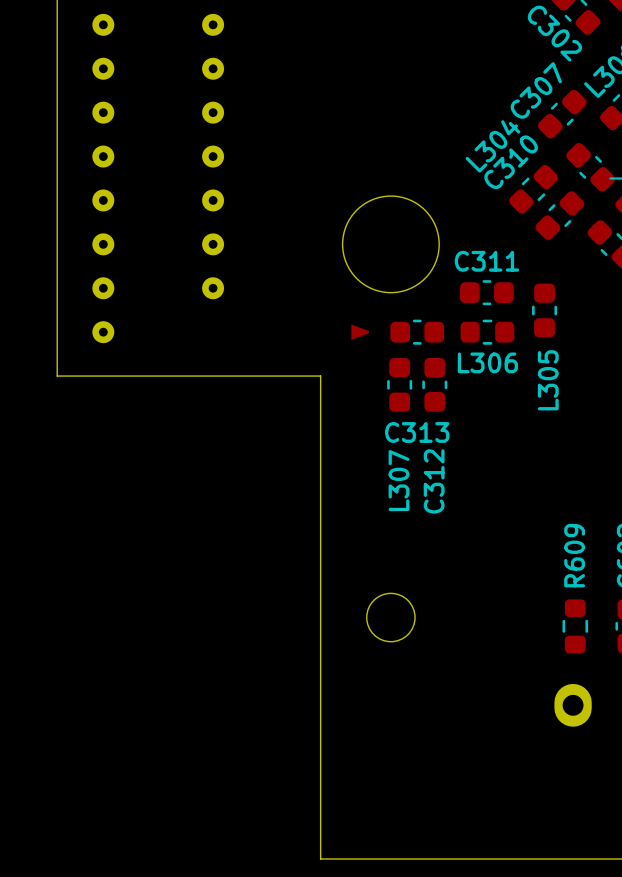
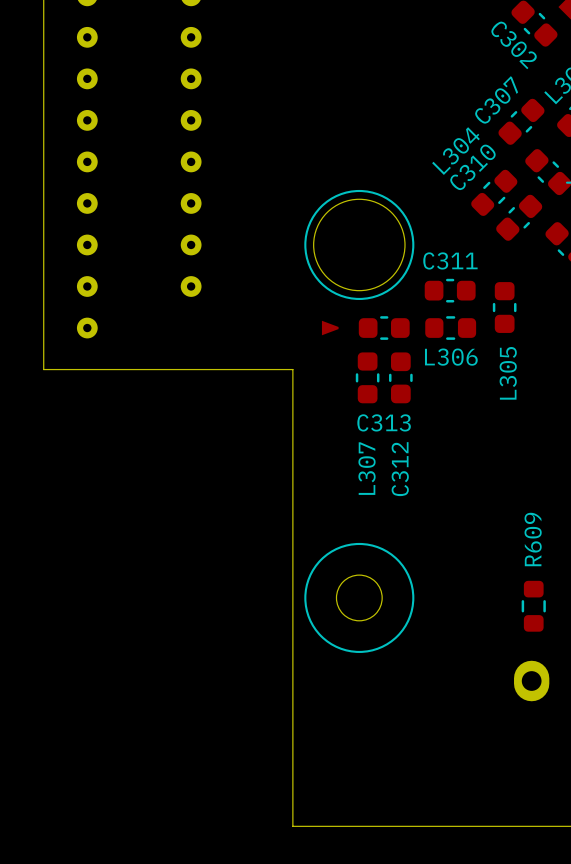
drawing: none -> [304, 189, 415, 300]
drawing: none -> [304, 542, 415, 653]

